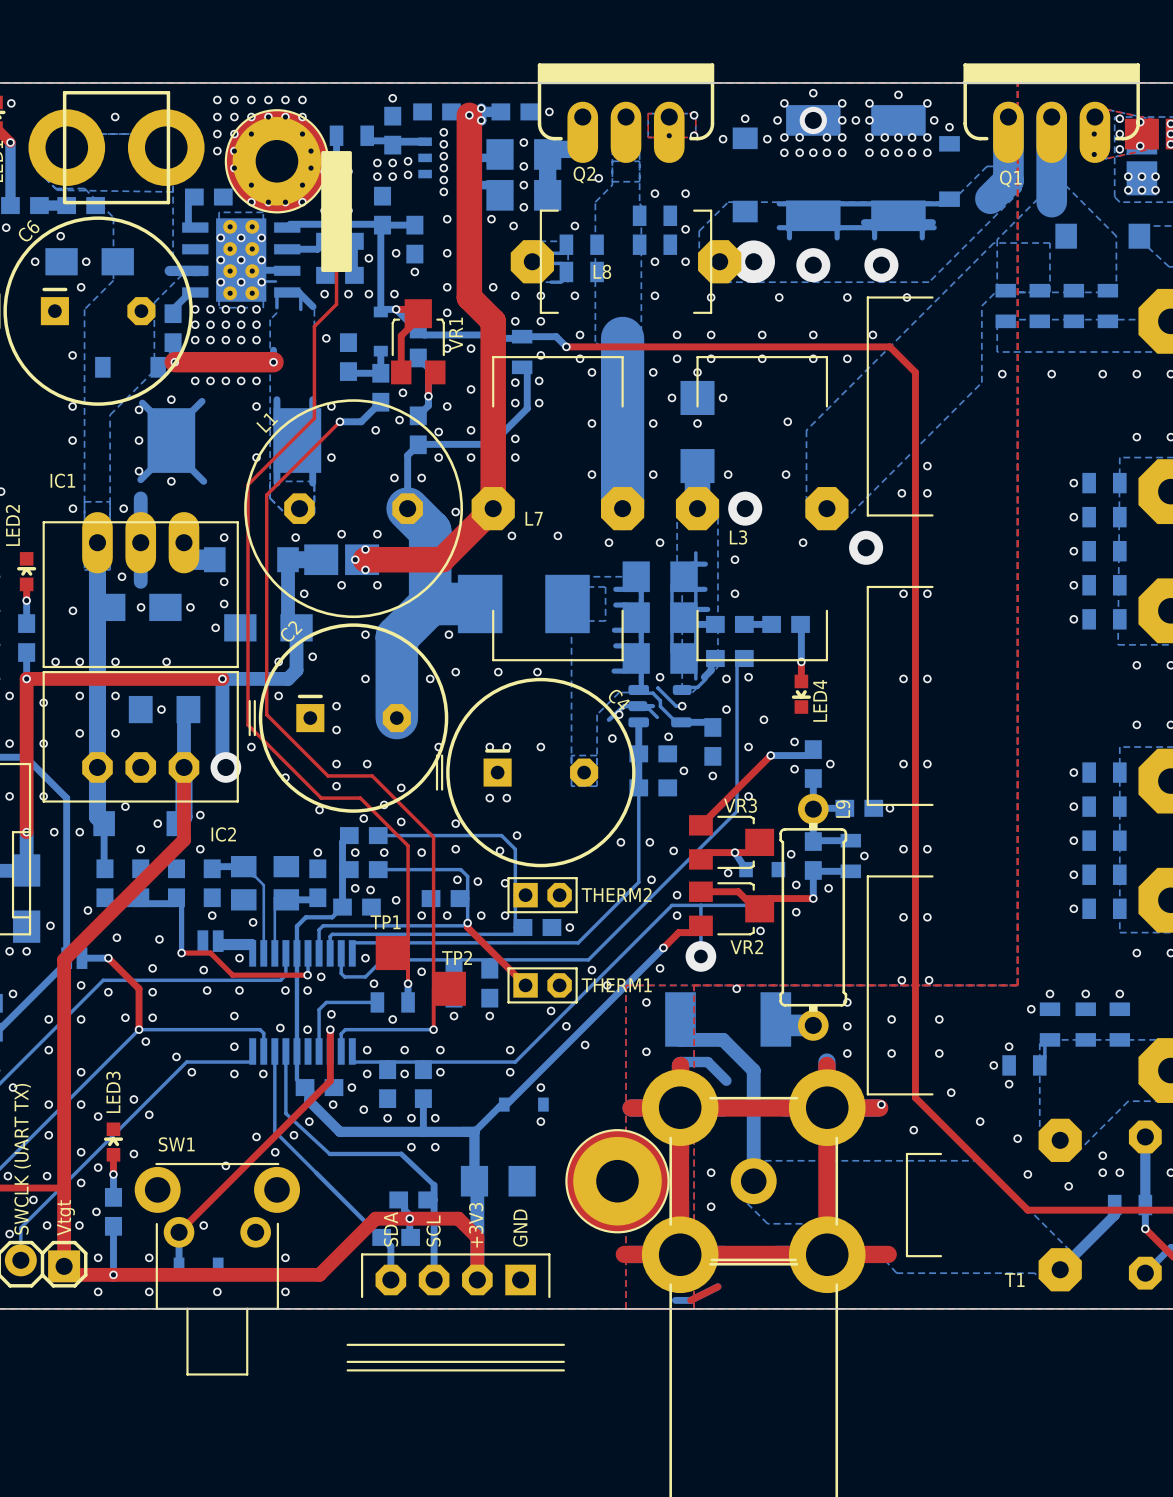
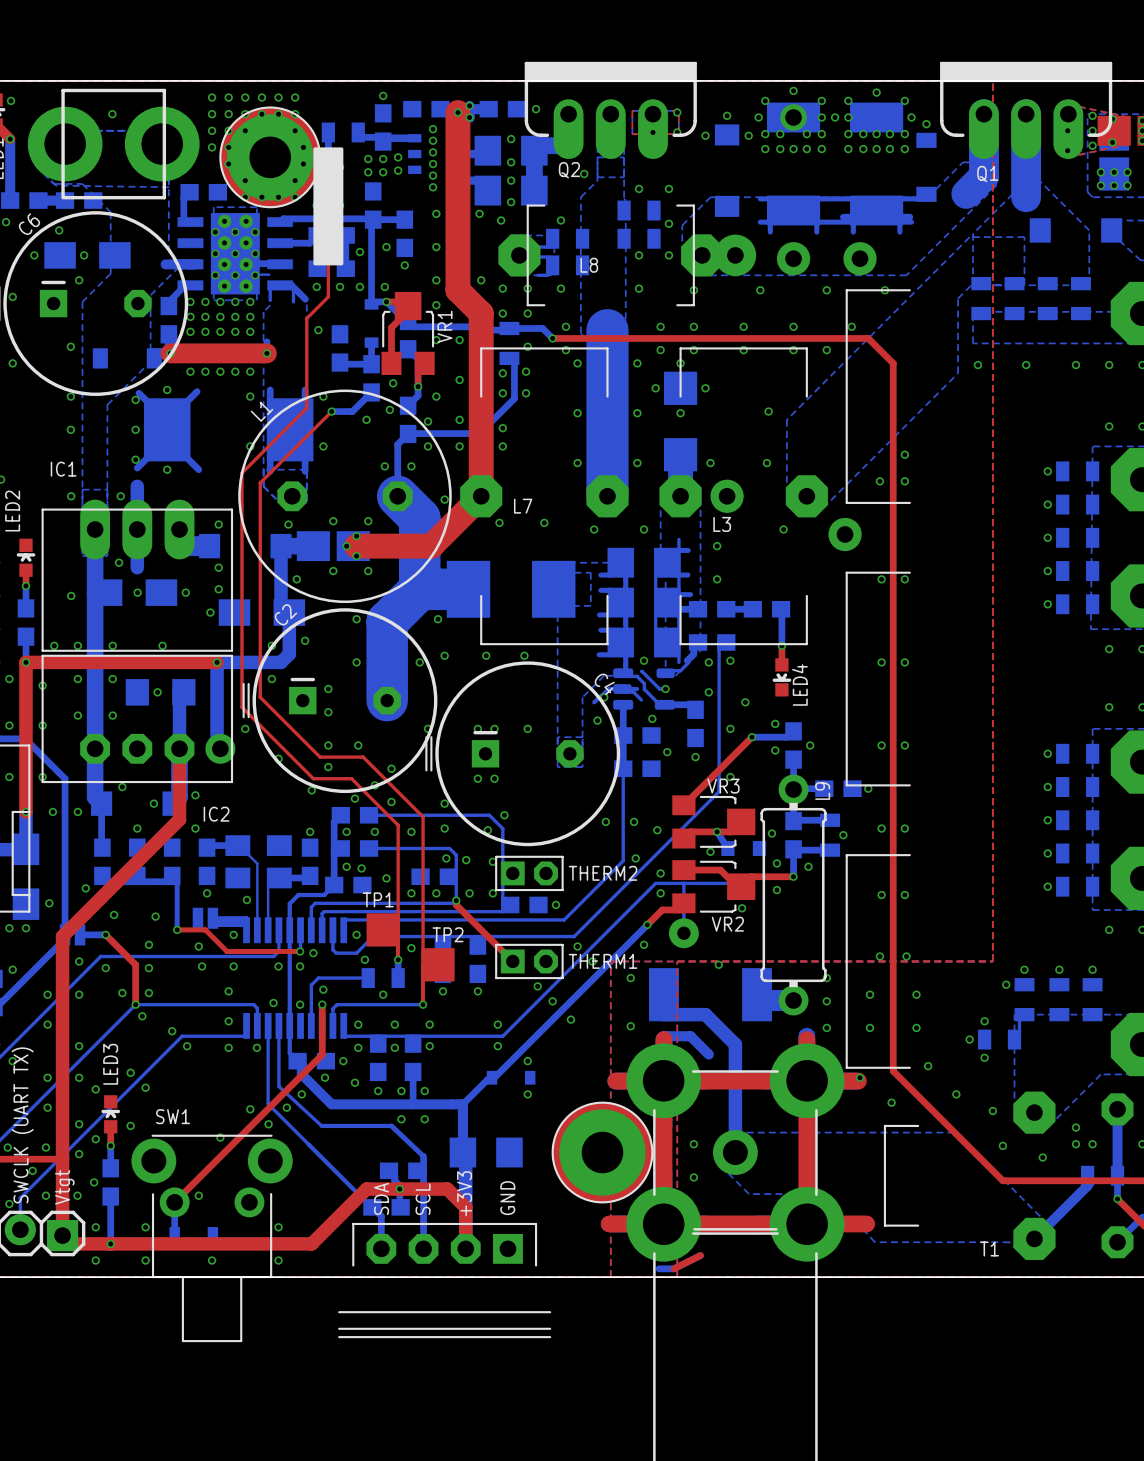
via: none -> (12, 296)
via: none -> (12, 363)

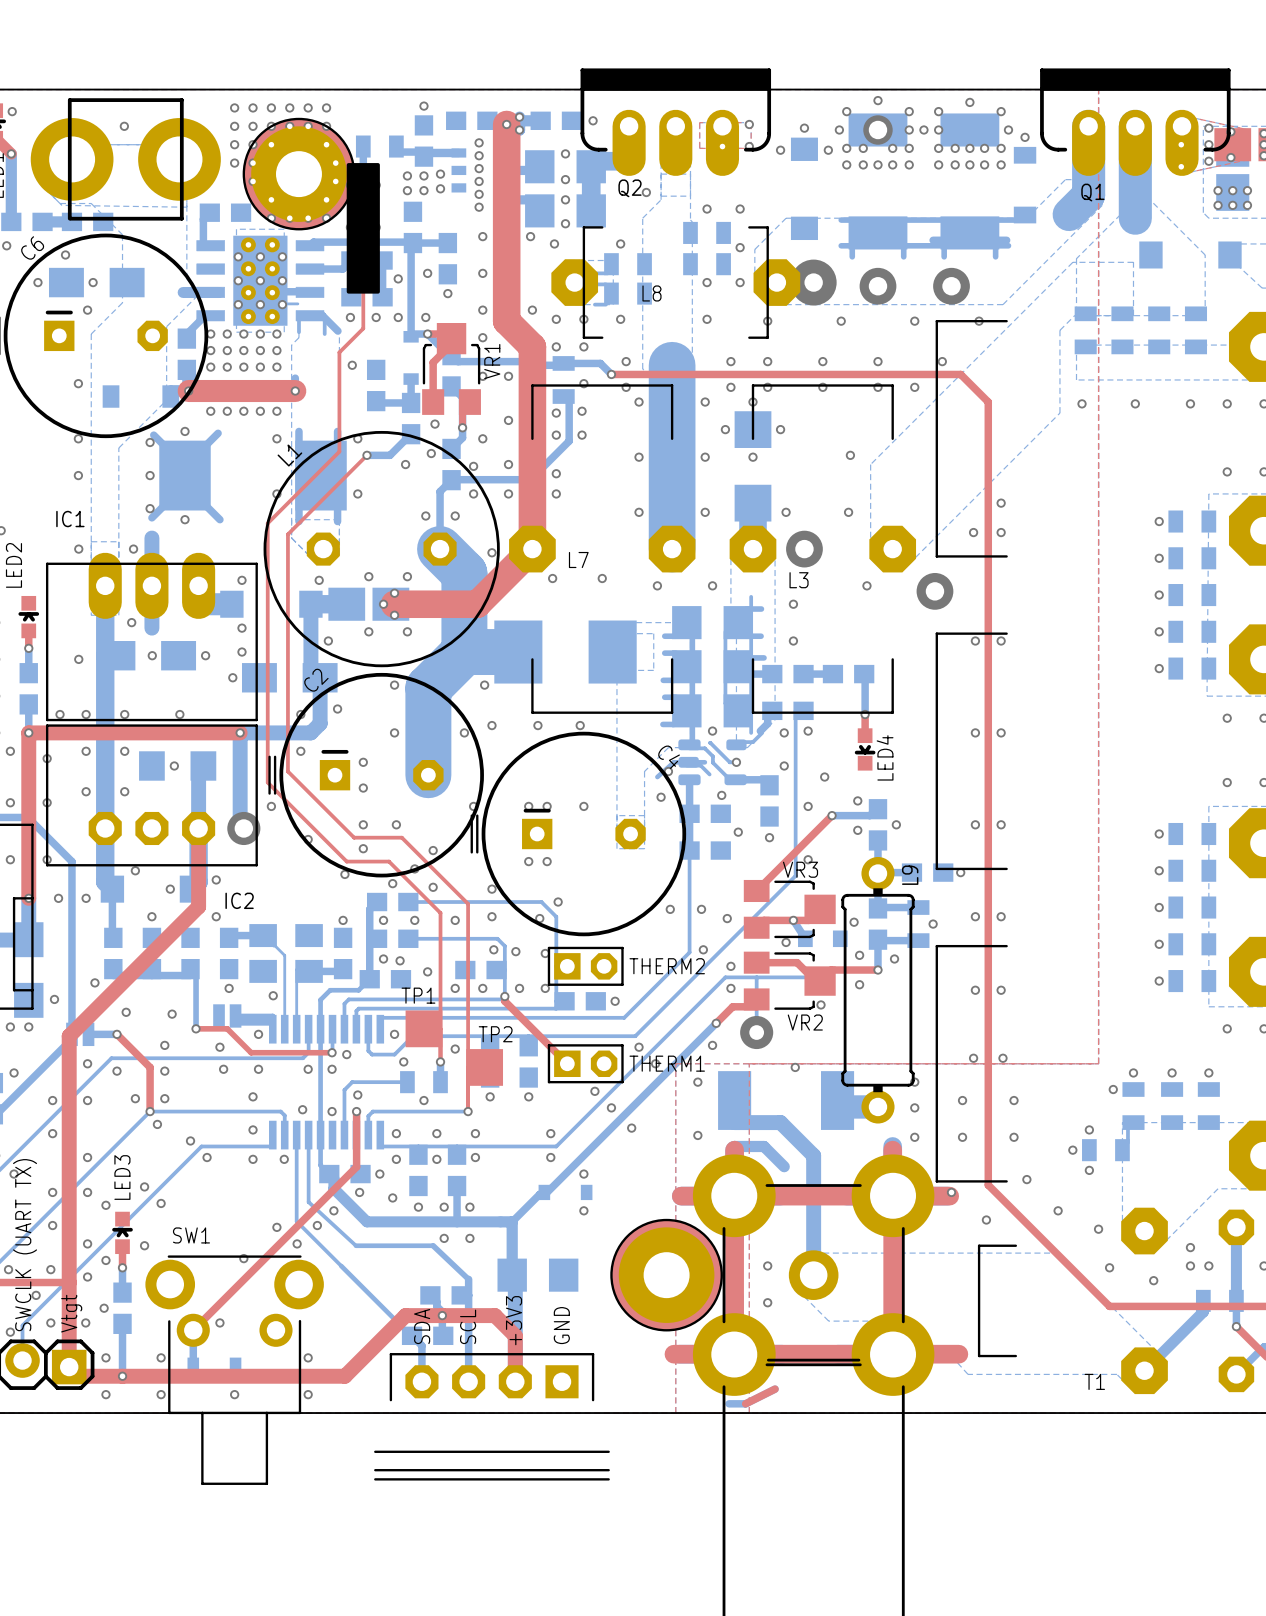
via: (12, 296) -> none
via: (12, 363) -> none

